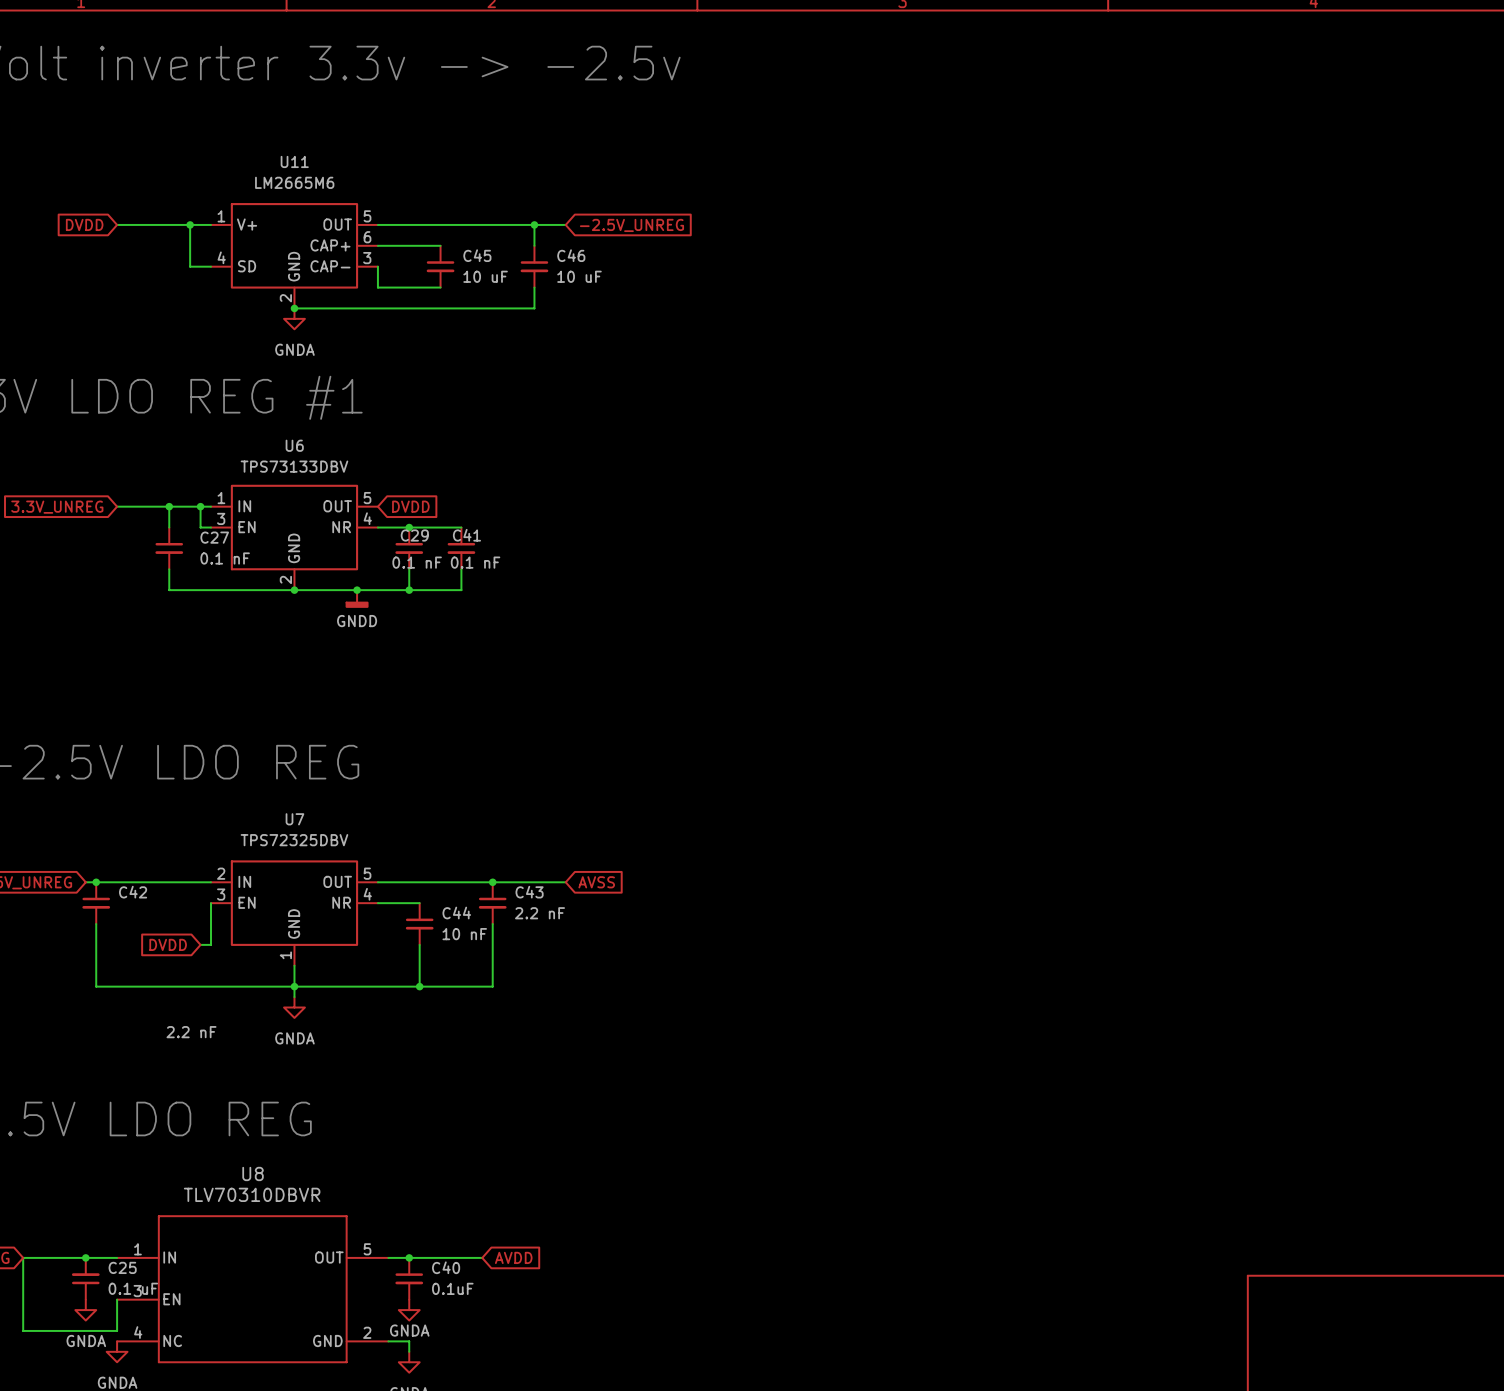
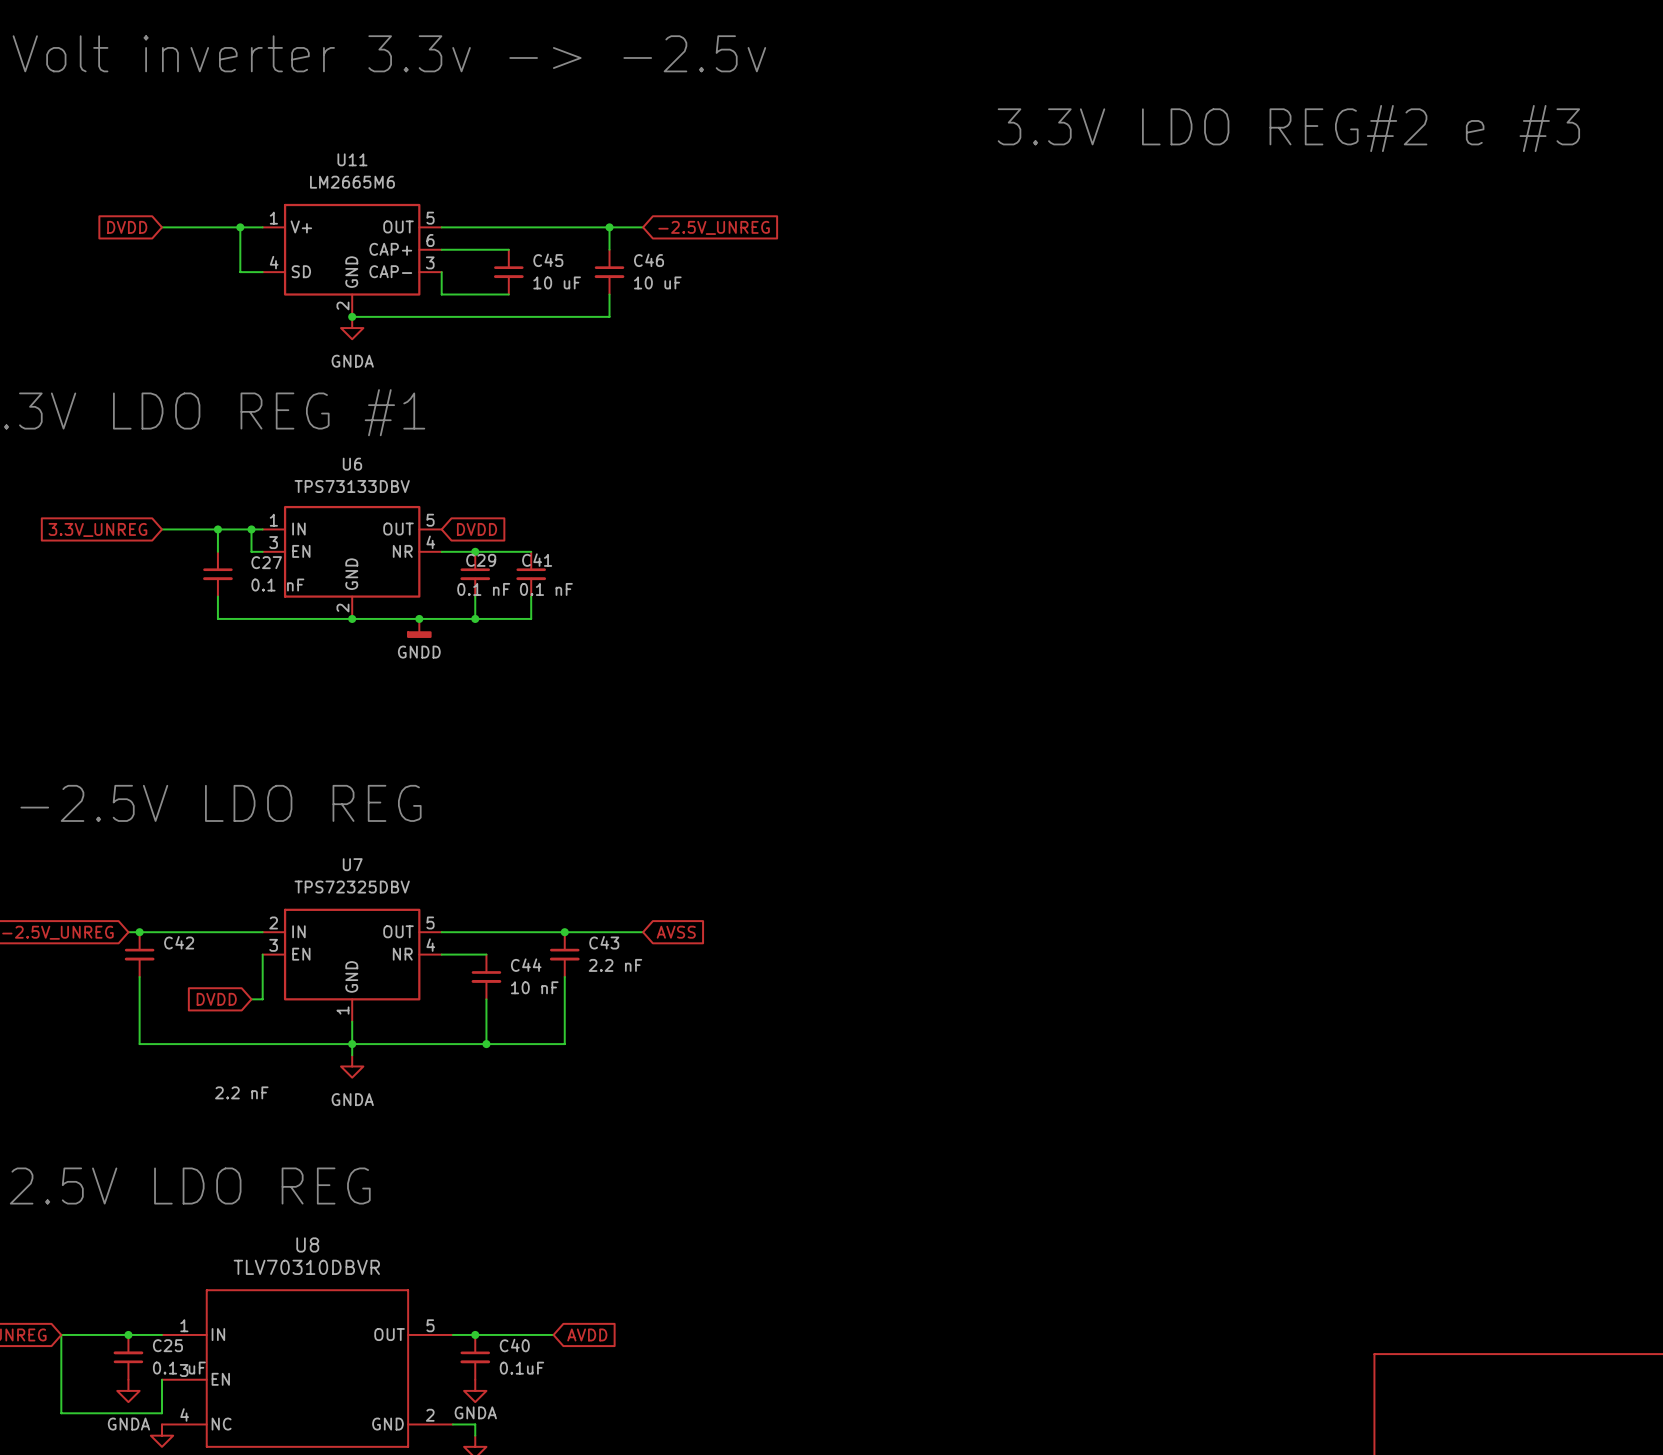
text: none -> 3.3V LDO REG#2 e #3 (1288, 128)

